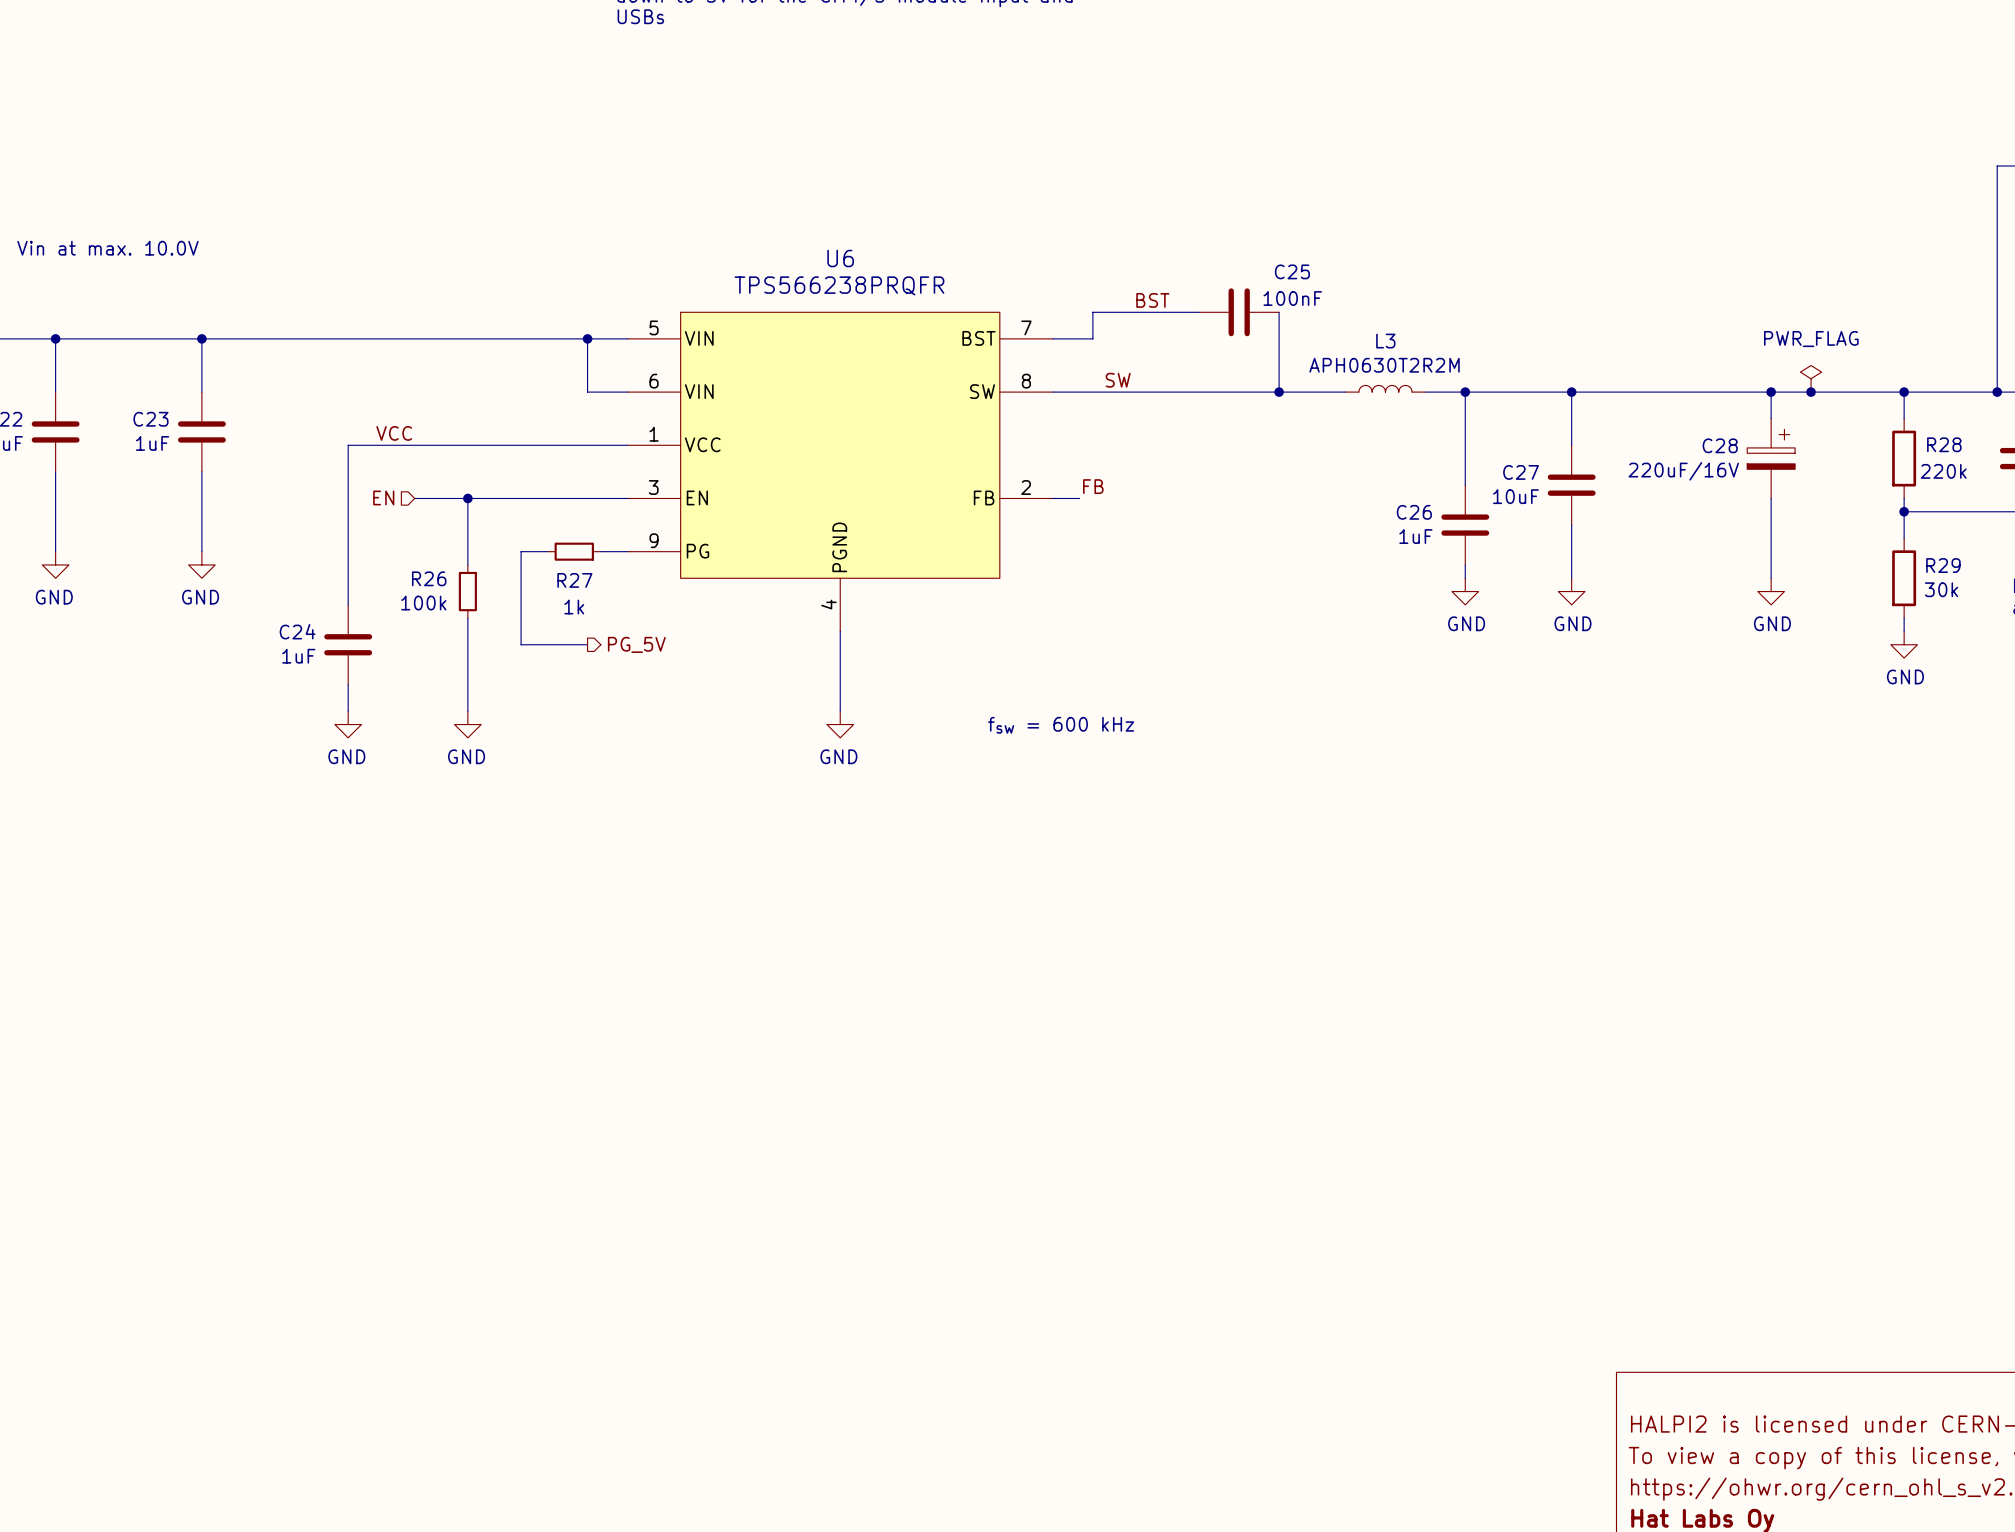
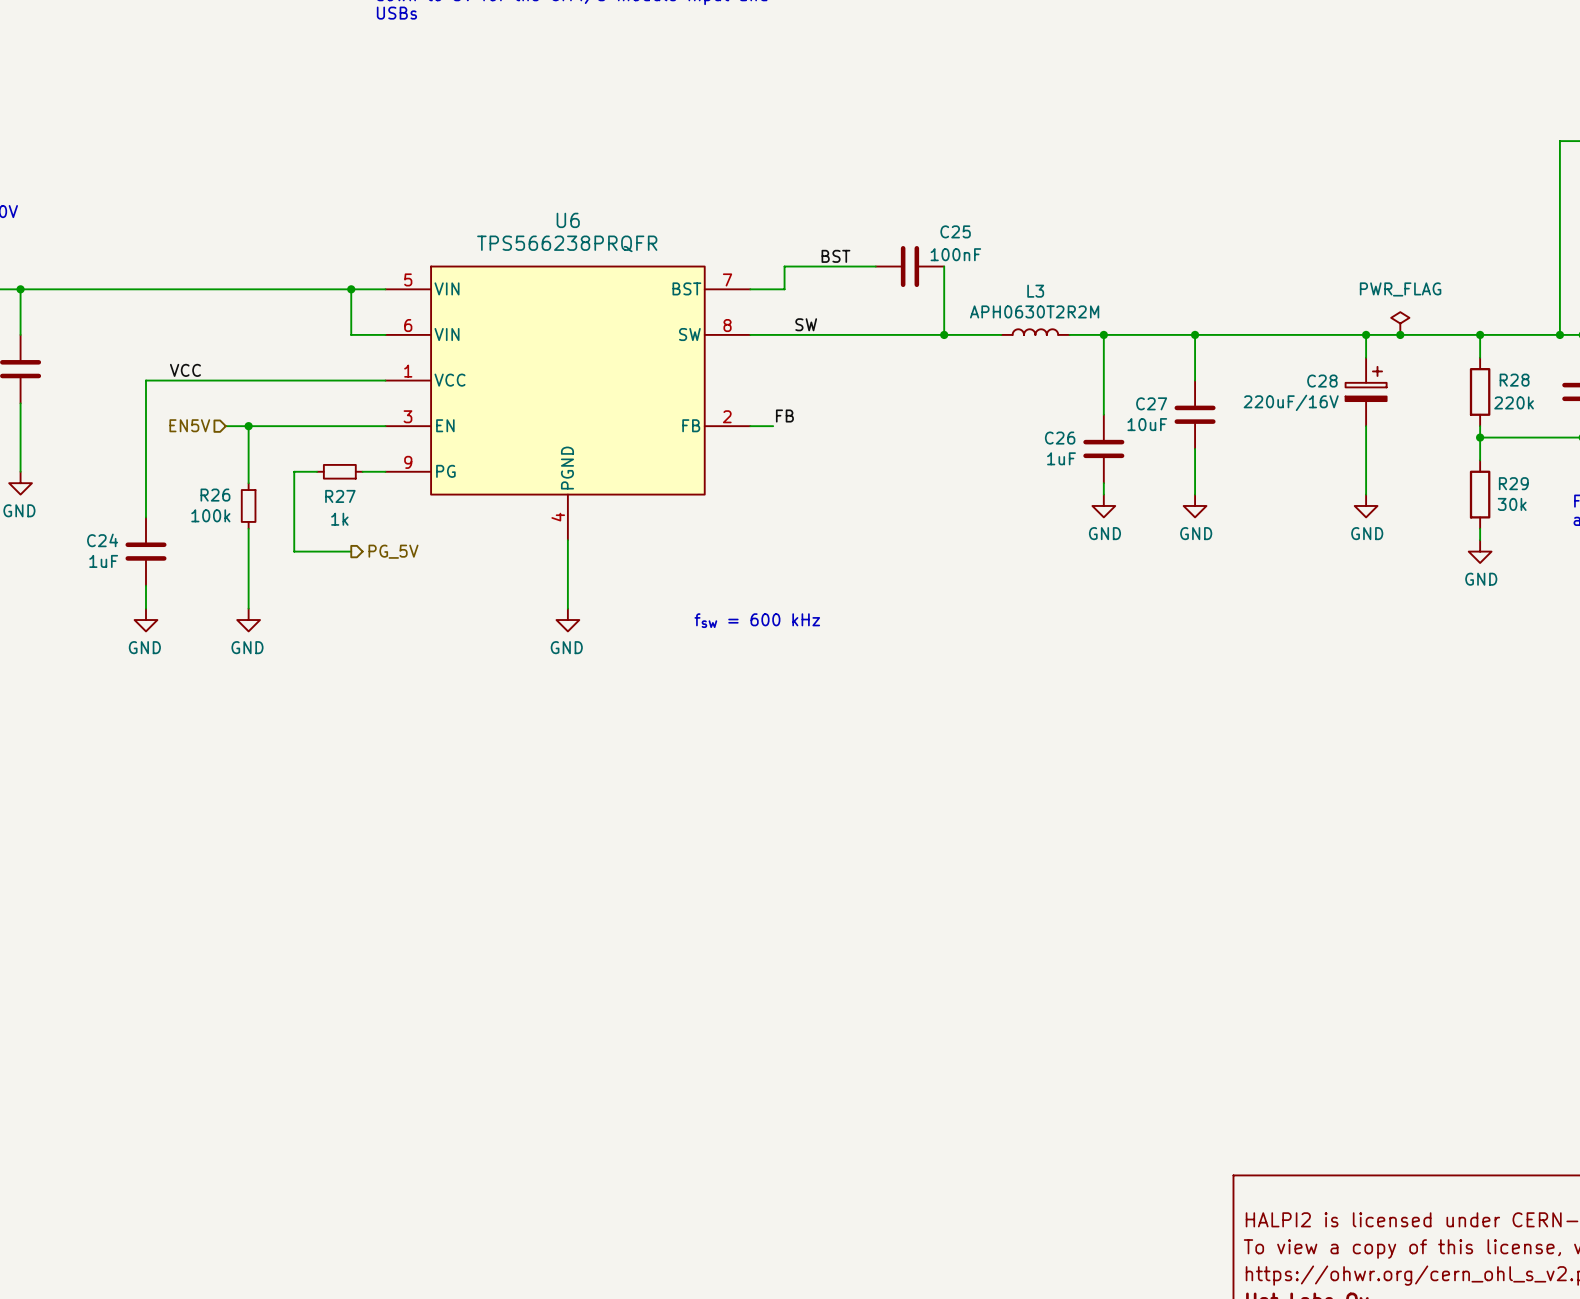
hierarchical label: EN (383, 497) -> EN5V (189, 425)
wire: (414, 498) (441, 498) -> none

